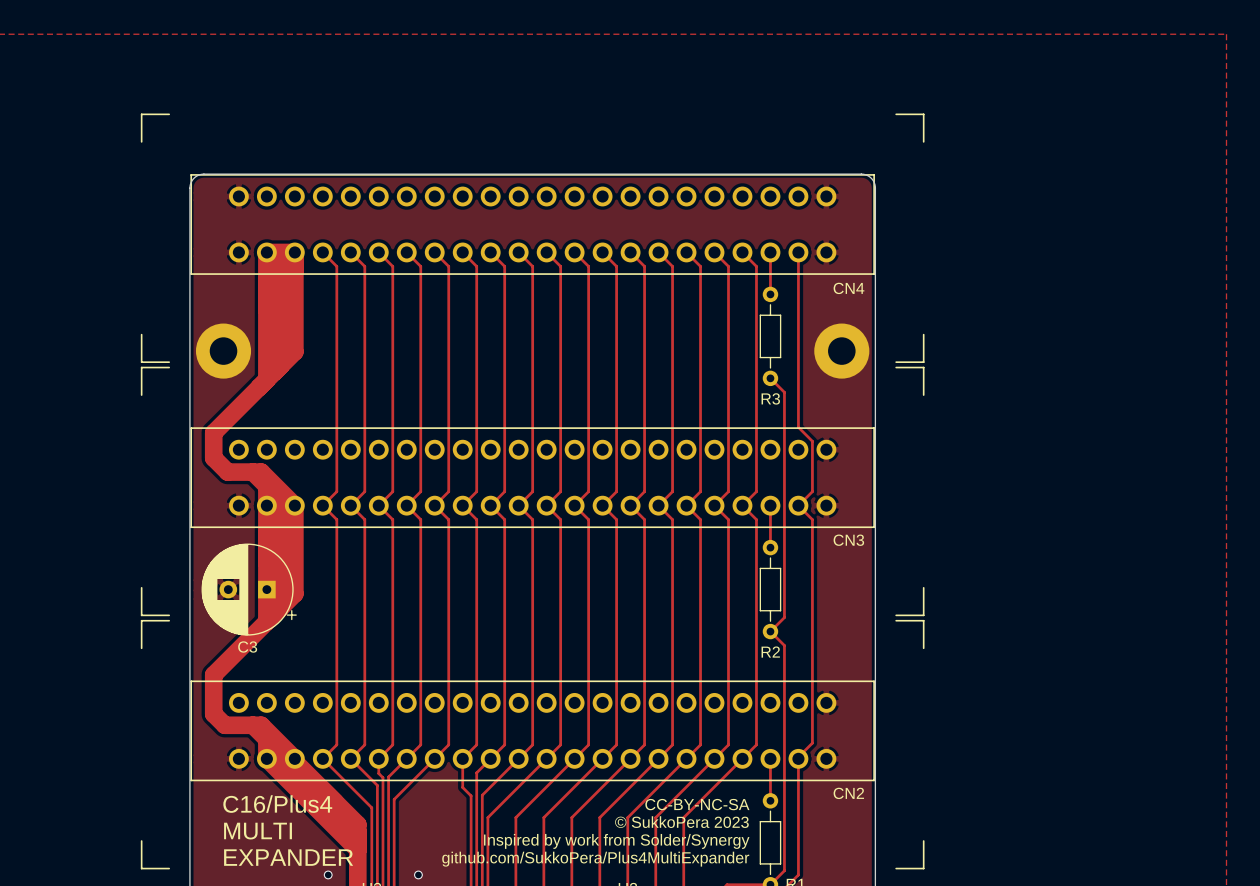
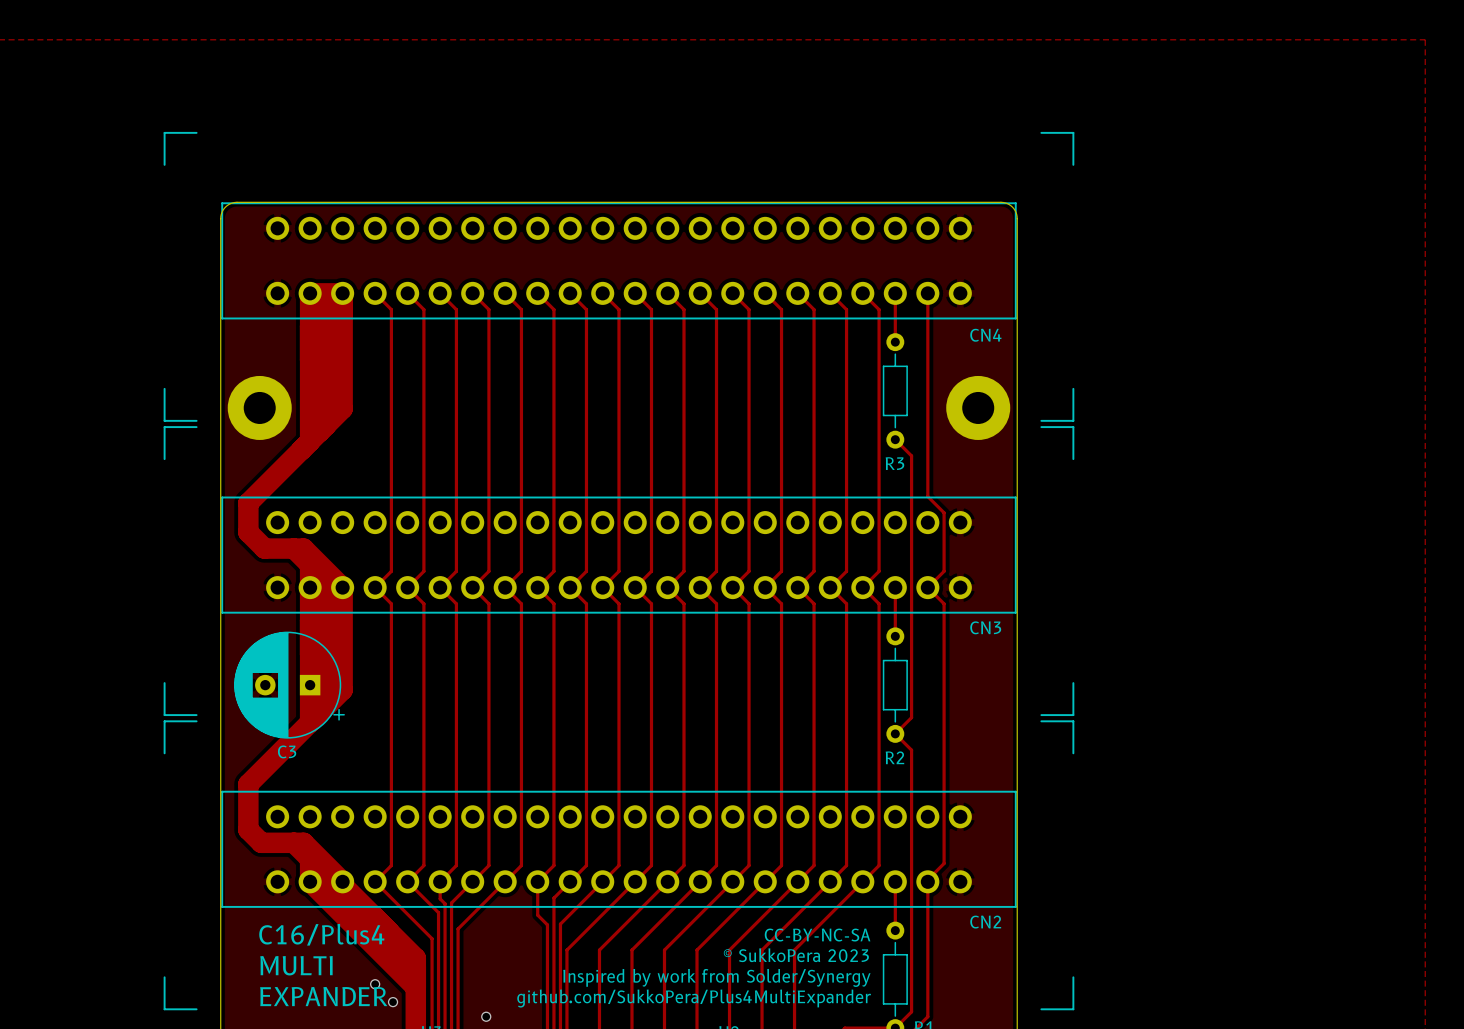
via: none -> (375, 984)
via: none -> (393, 1002)
via: (328, 874) -> none

